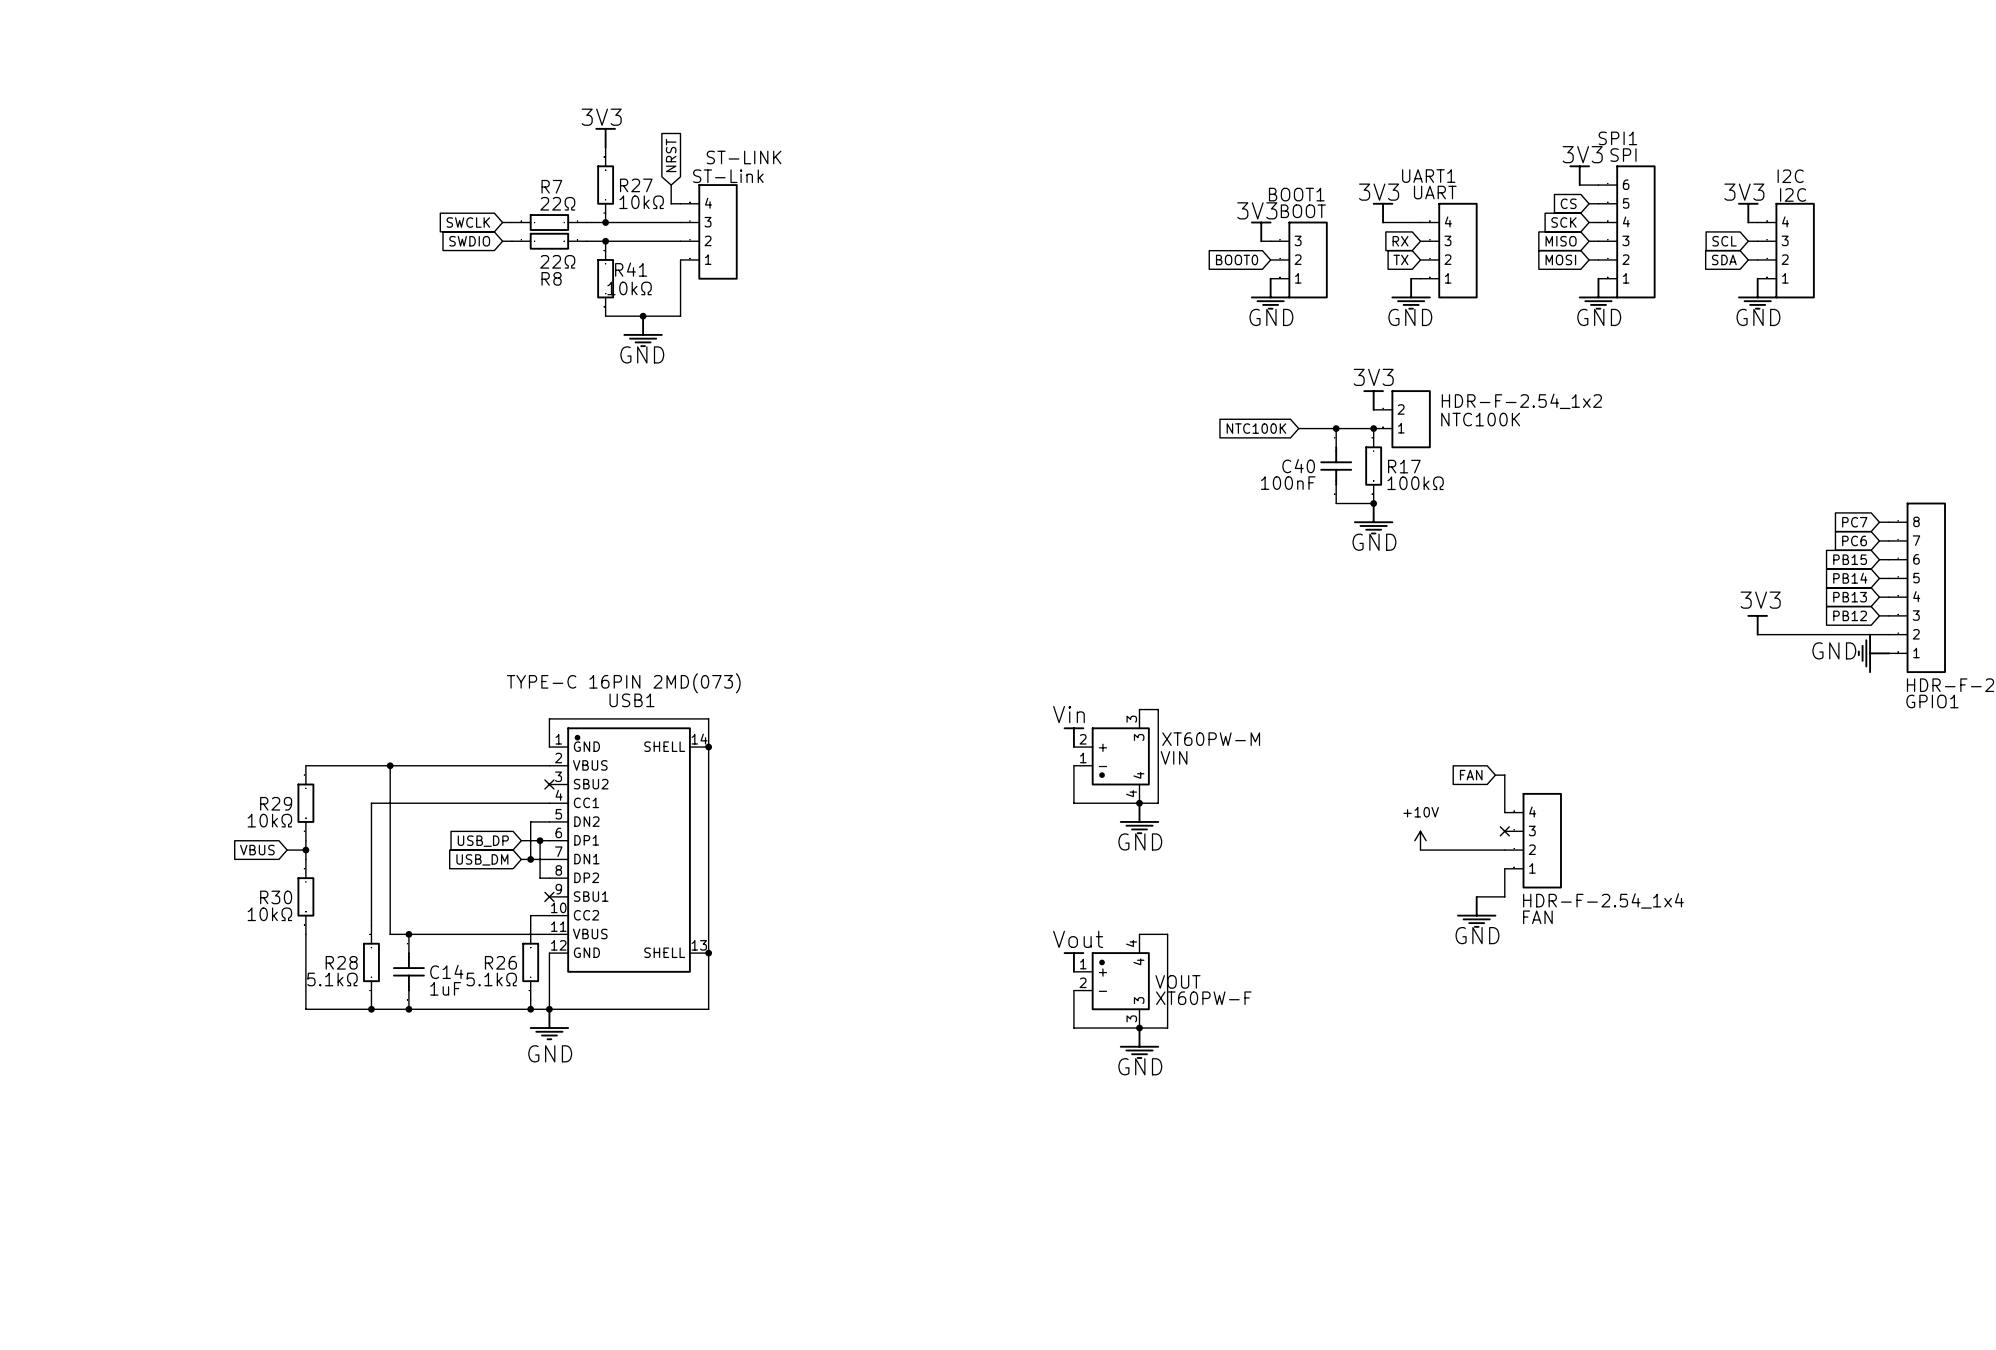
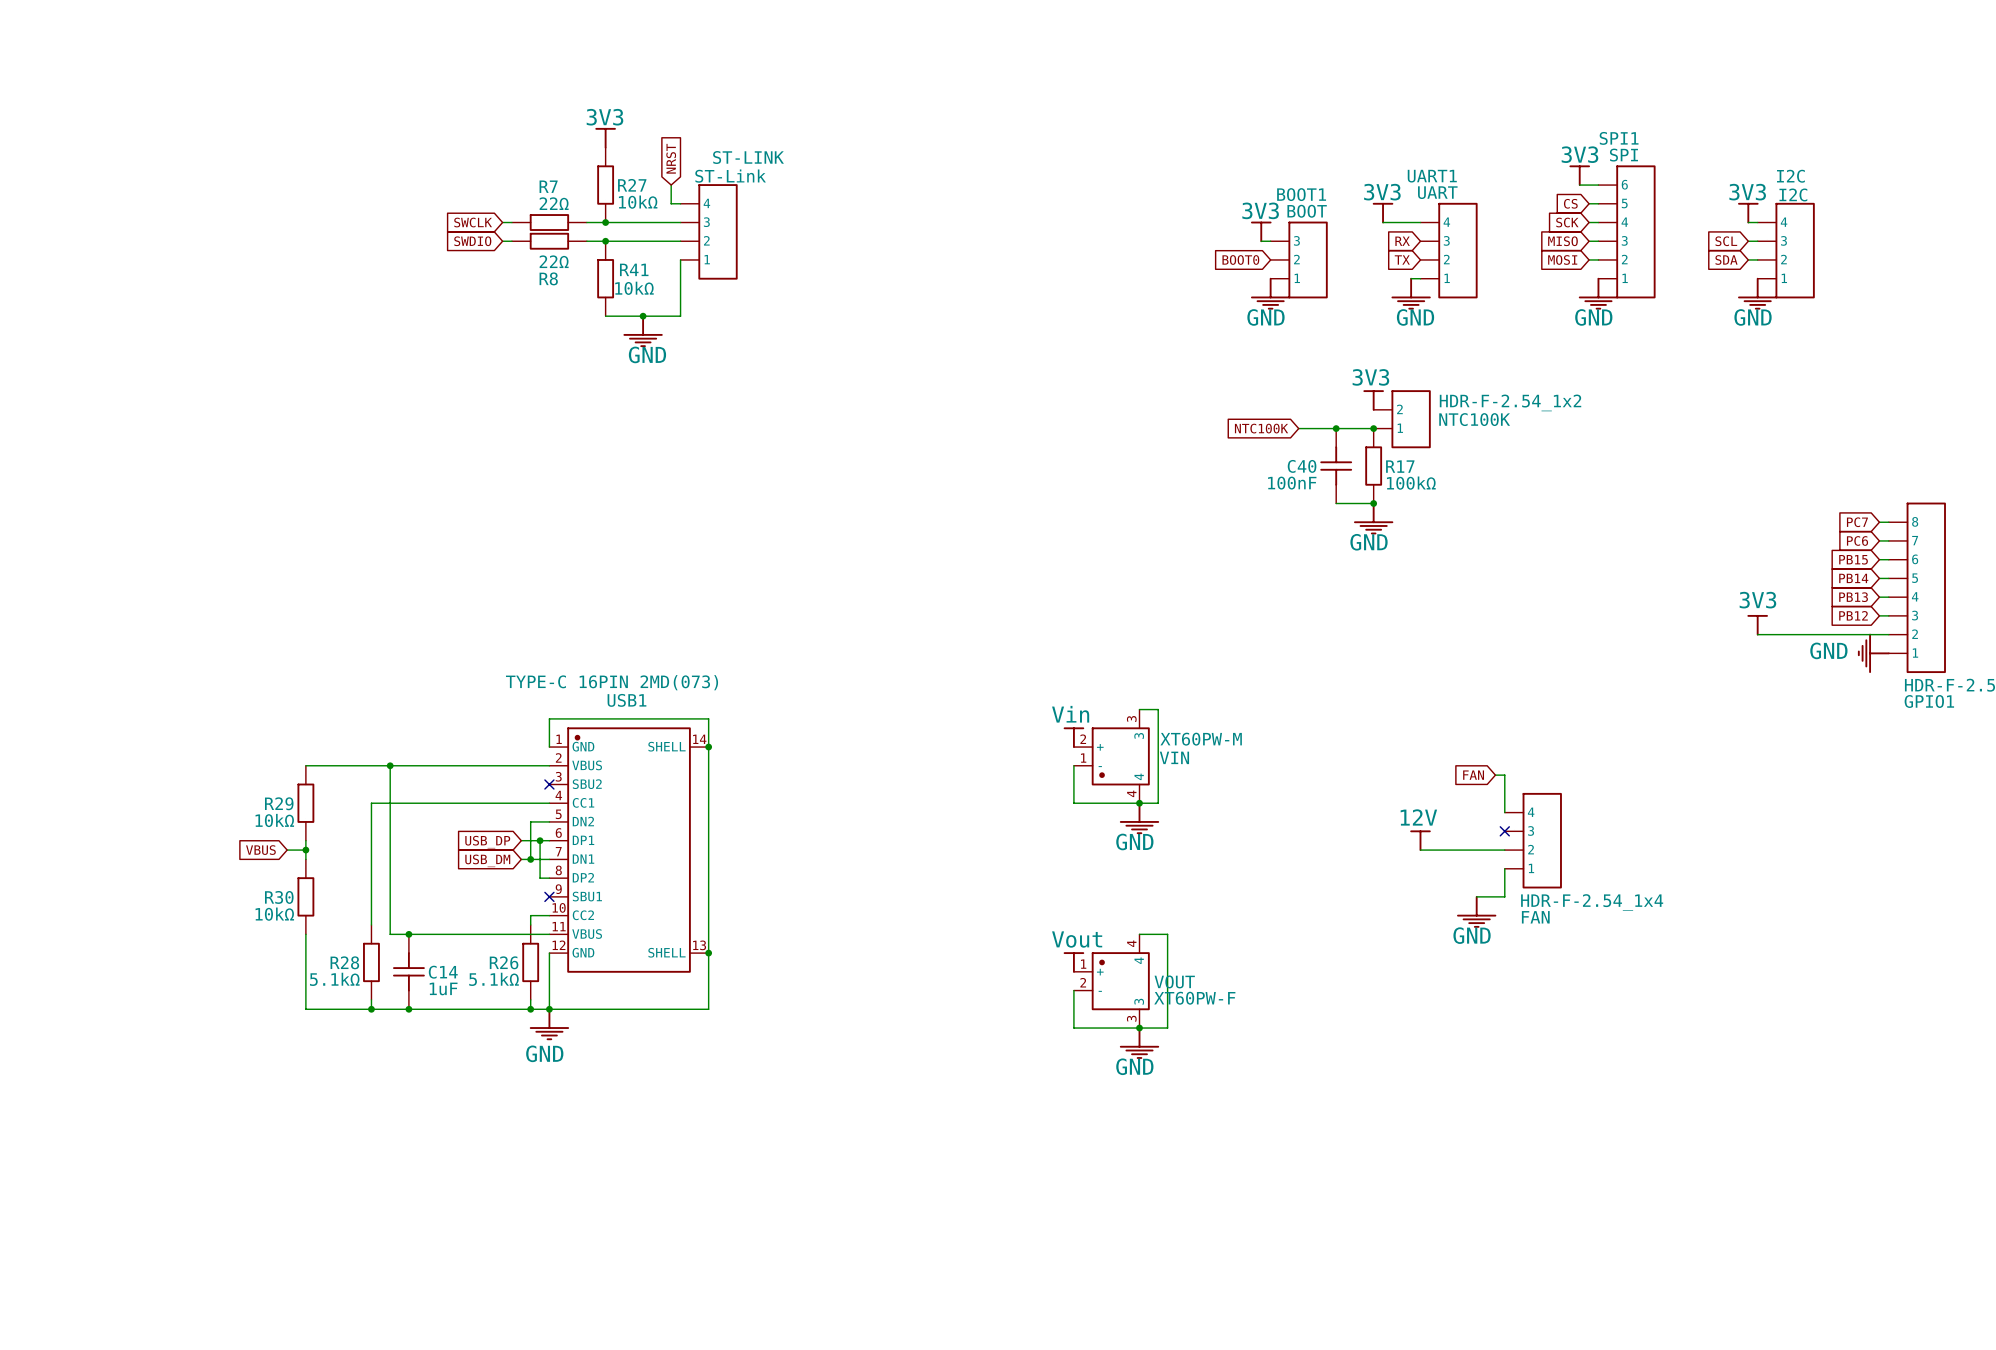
power symbol: +10V (1420, 840) -> 12V (1420, 840)

